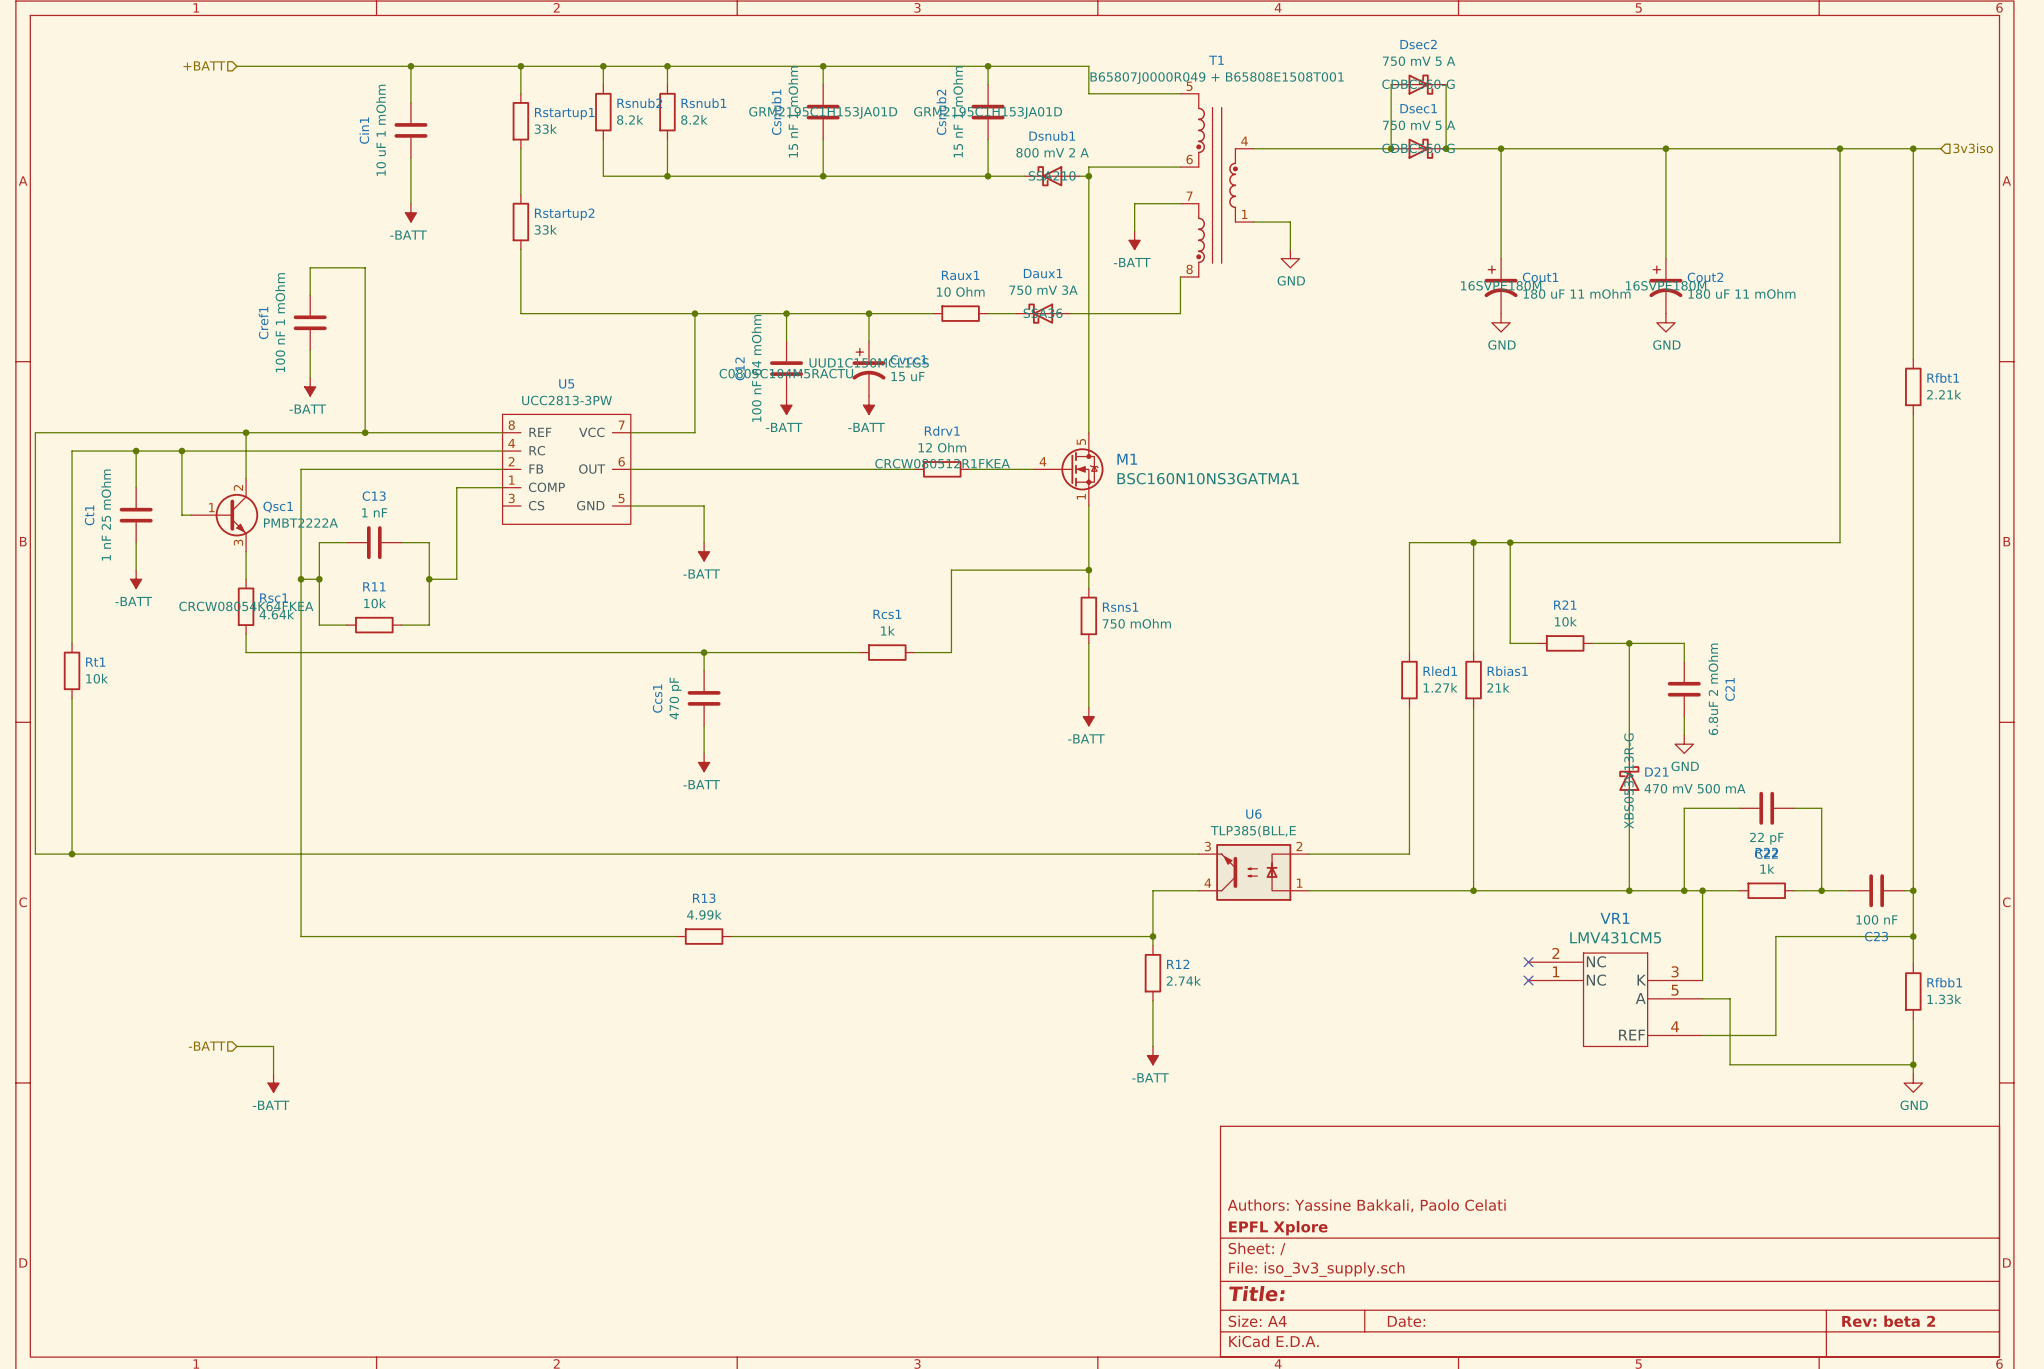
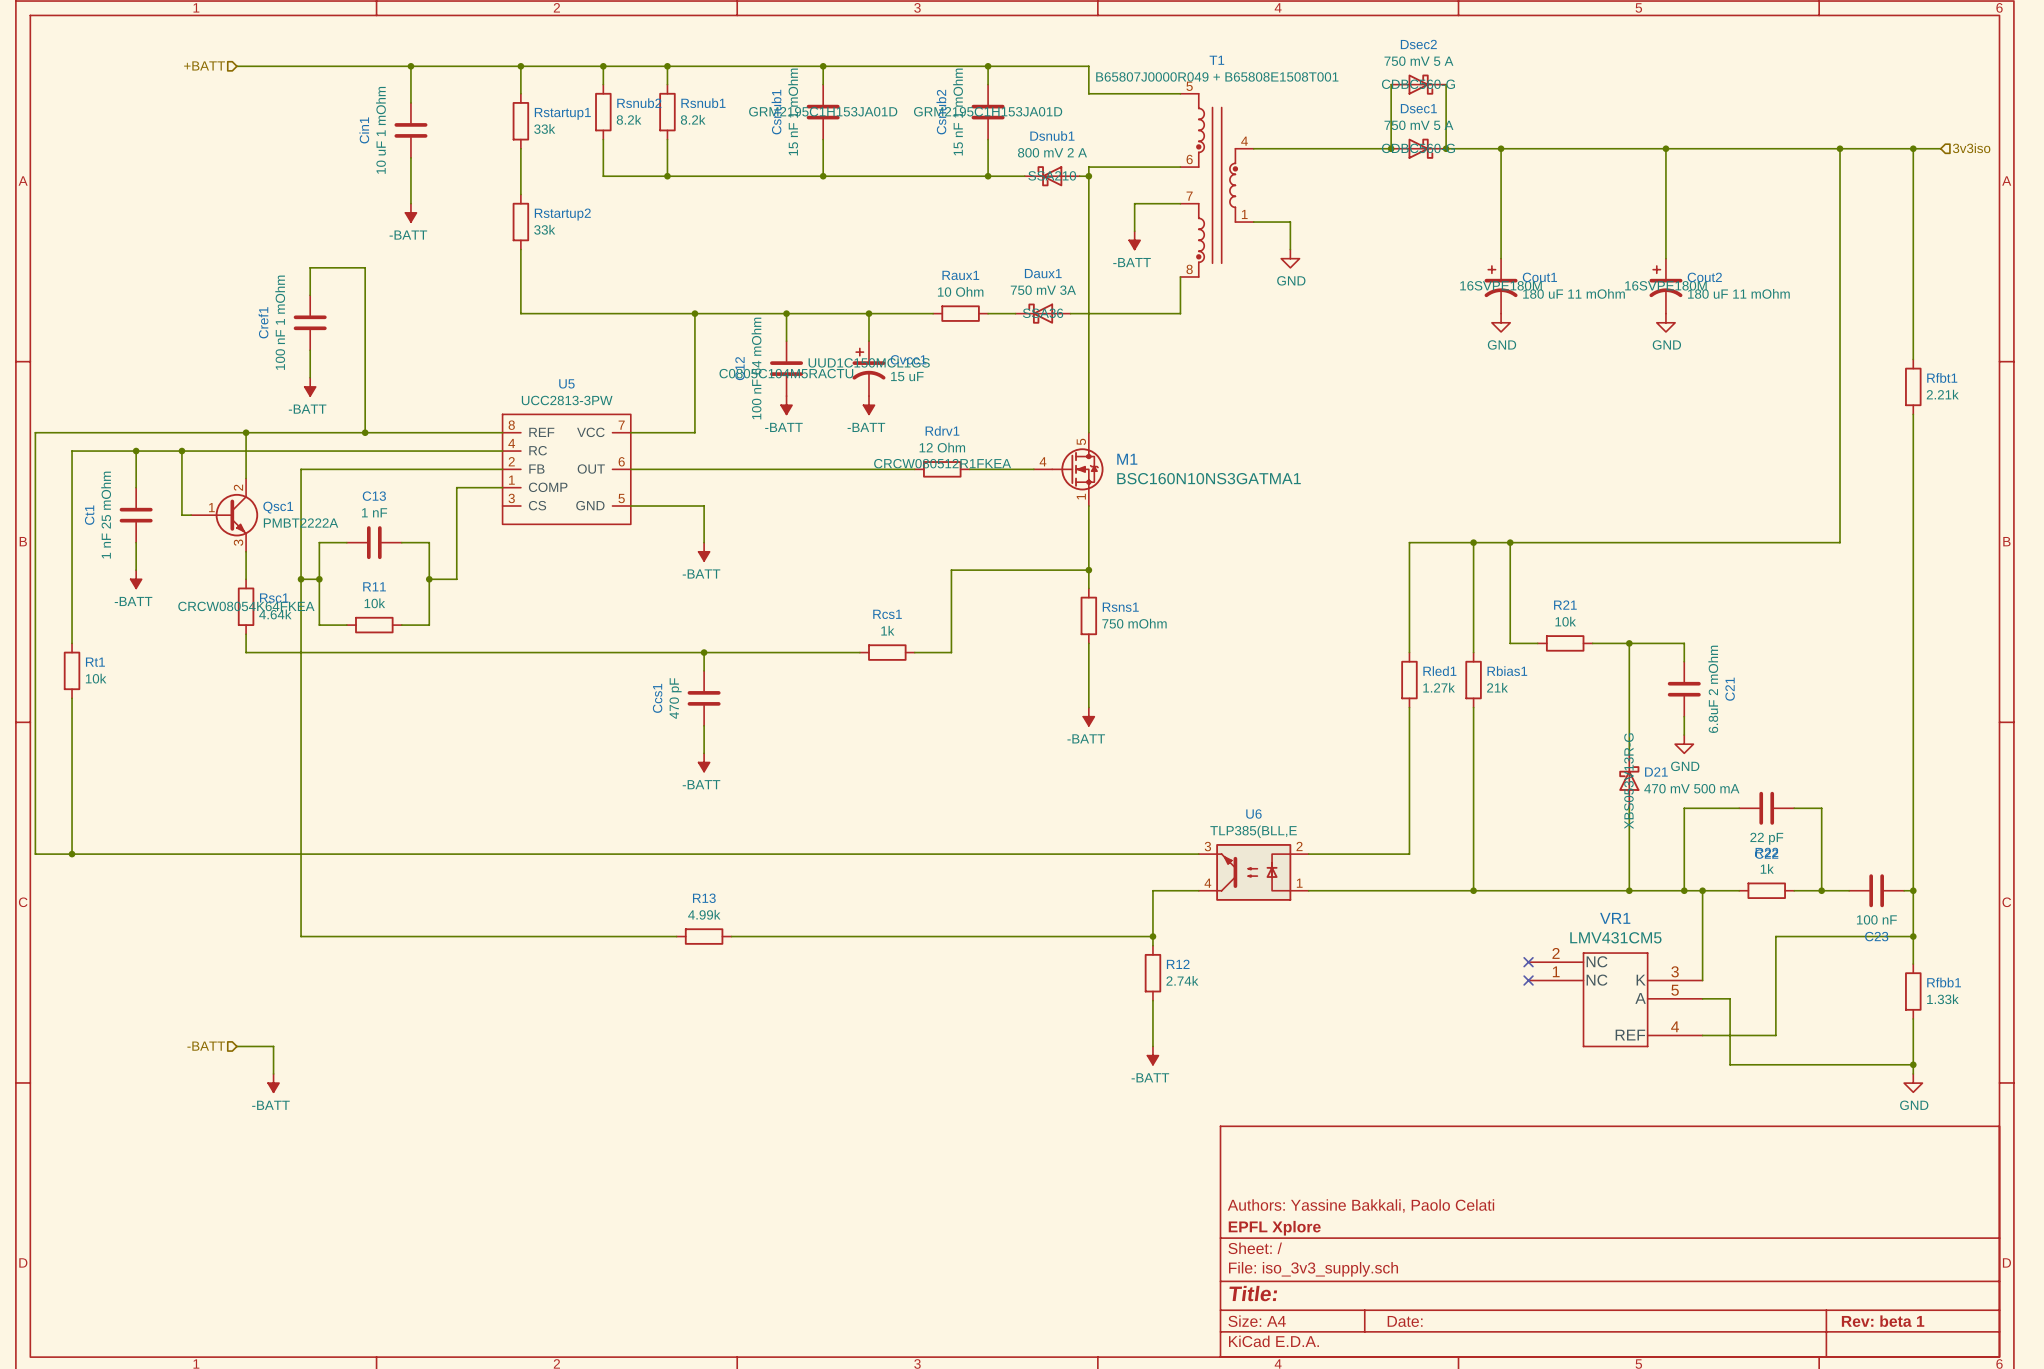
title block: Rev: beta 2 (1888, 1321) -> Rev: beta 1 (1883, 1321)

